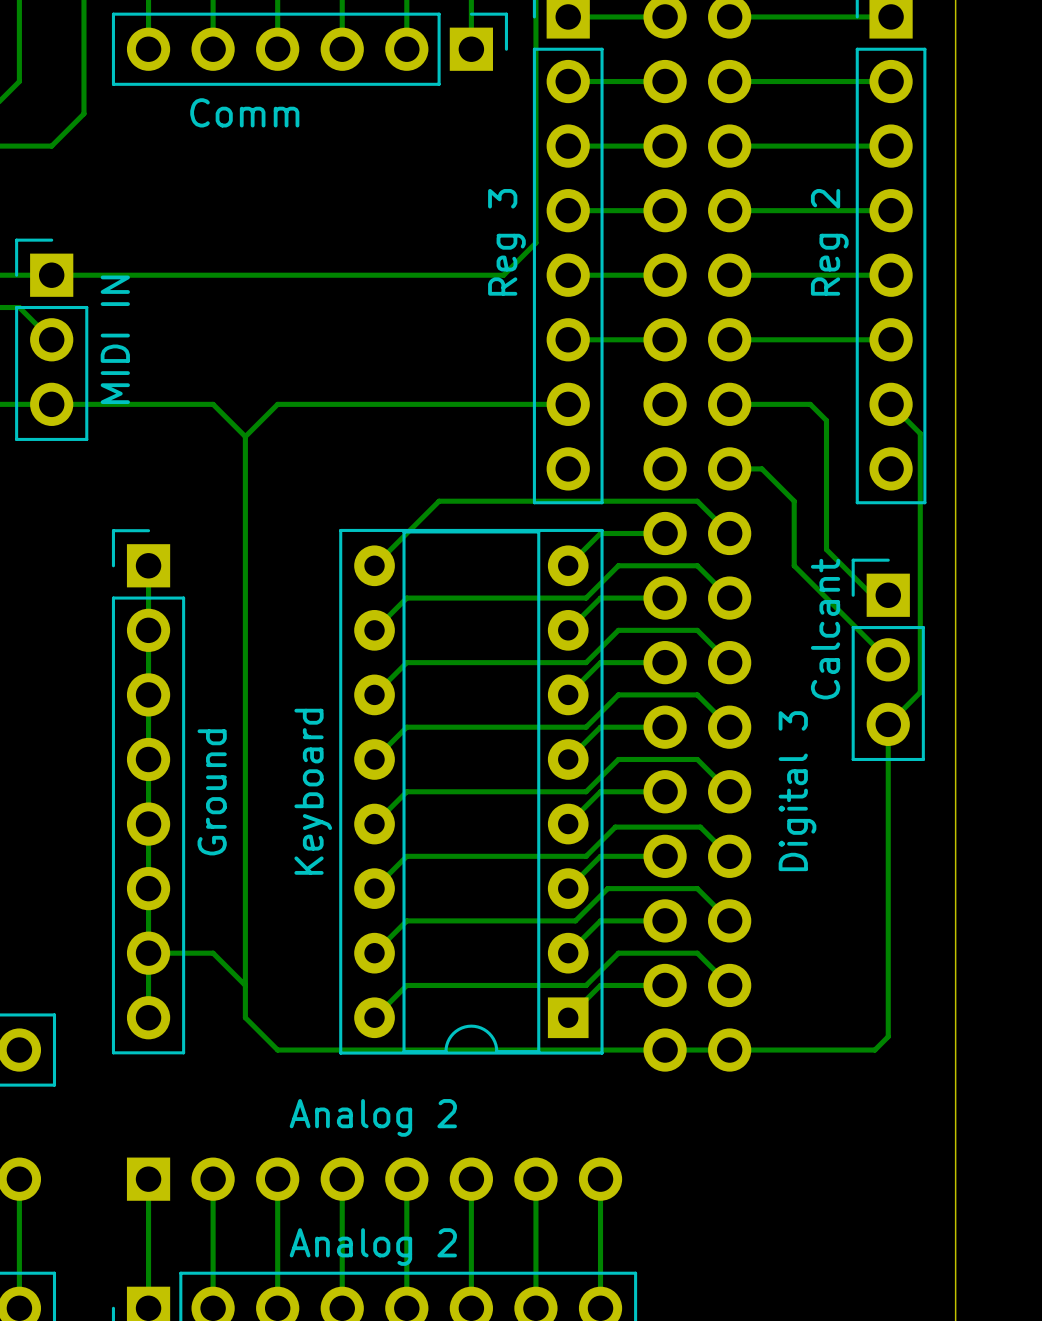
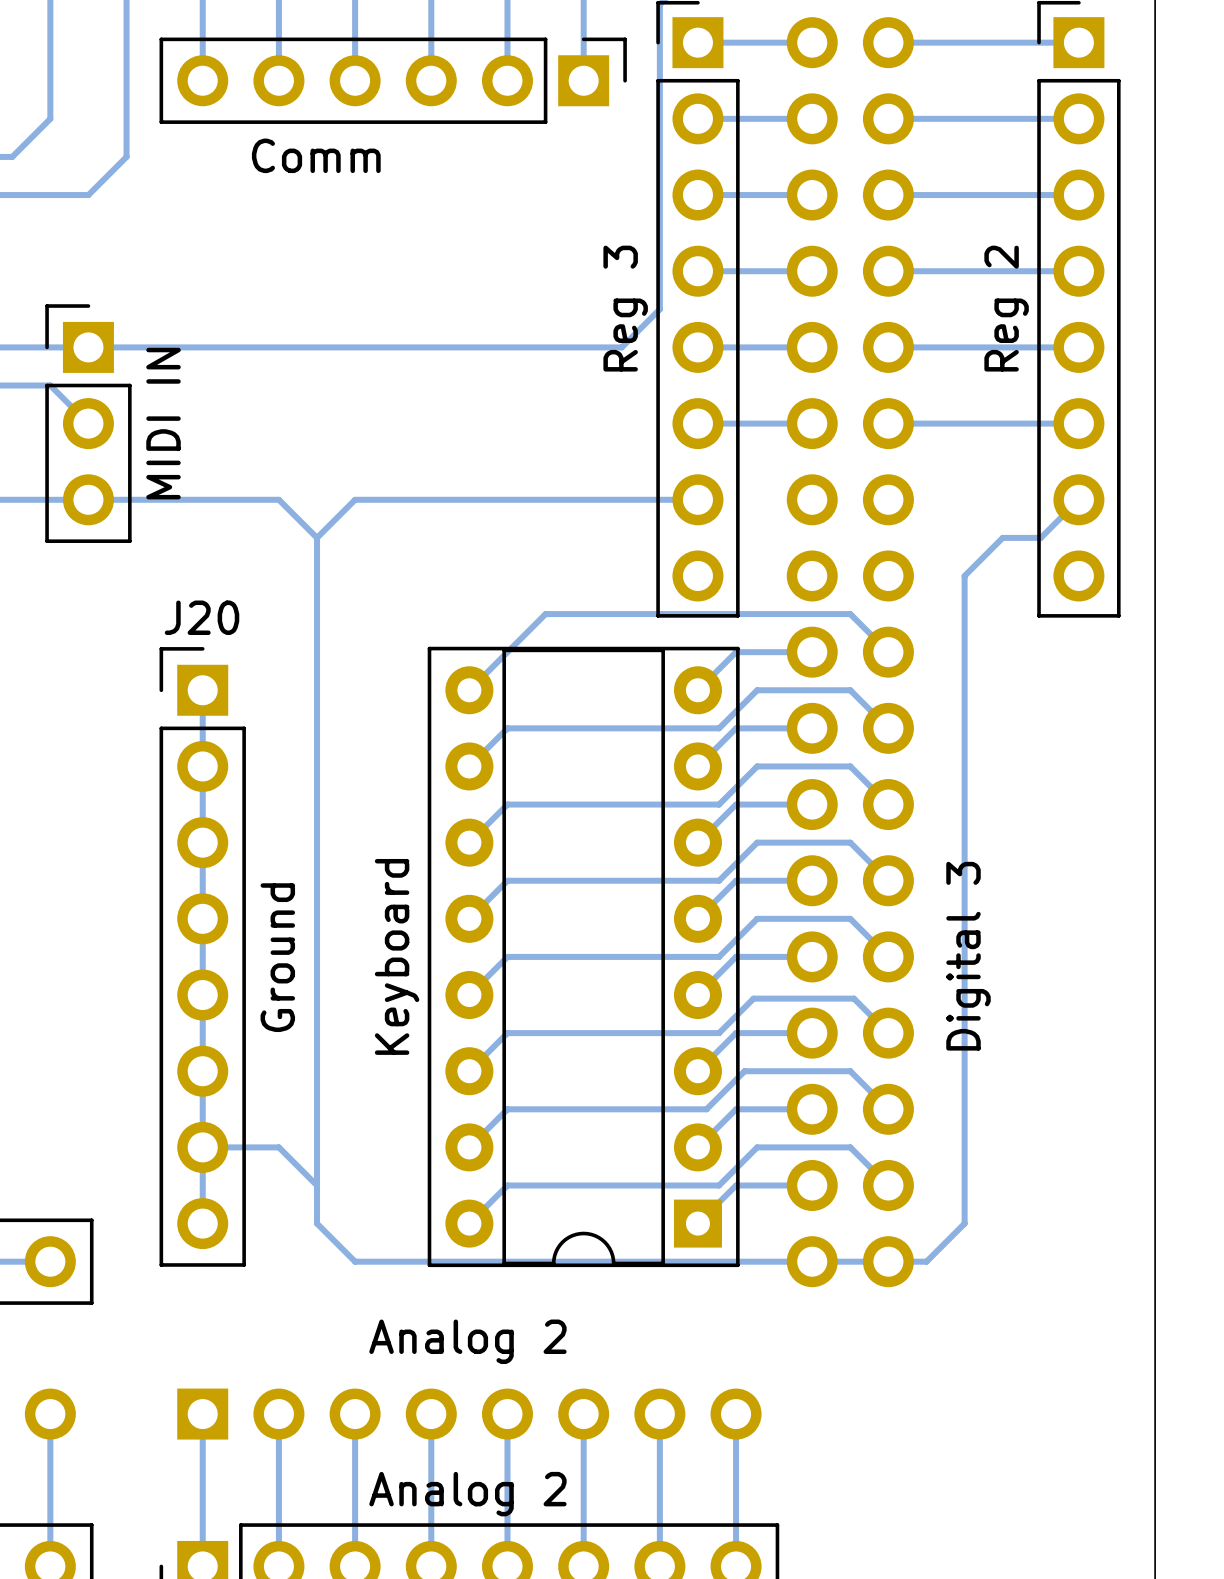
bottom track: (729, 404) (810, 404) (826, 420) (826, 549) (872, 595) (888, 595) -> none
bottom track: (891, 404) (920, 433) (920, 692) (888, 724) (888, 1036) (874, 1050) (761, 1050) -> (964, 690) (964, 1223) (926, 1261)
bottom track: (729, 468) (761, 468) (794, 501) -> (1078, 499) (1040, 537) (1002, 537) (964, 575) (964, 614)
J20 name: none -> J20 (202, 617)
bottom track: (794, 565) (888, 659) -> none
part: Calcant (888, 659) -> none

